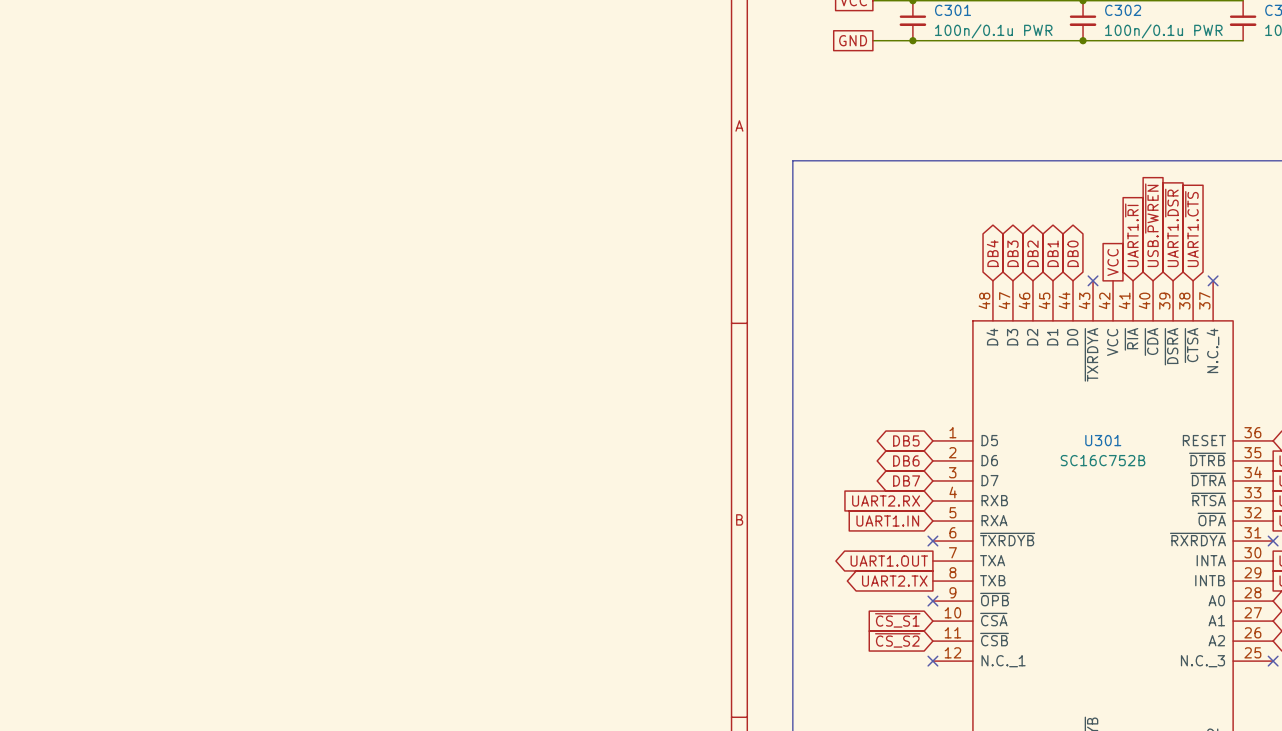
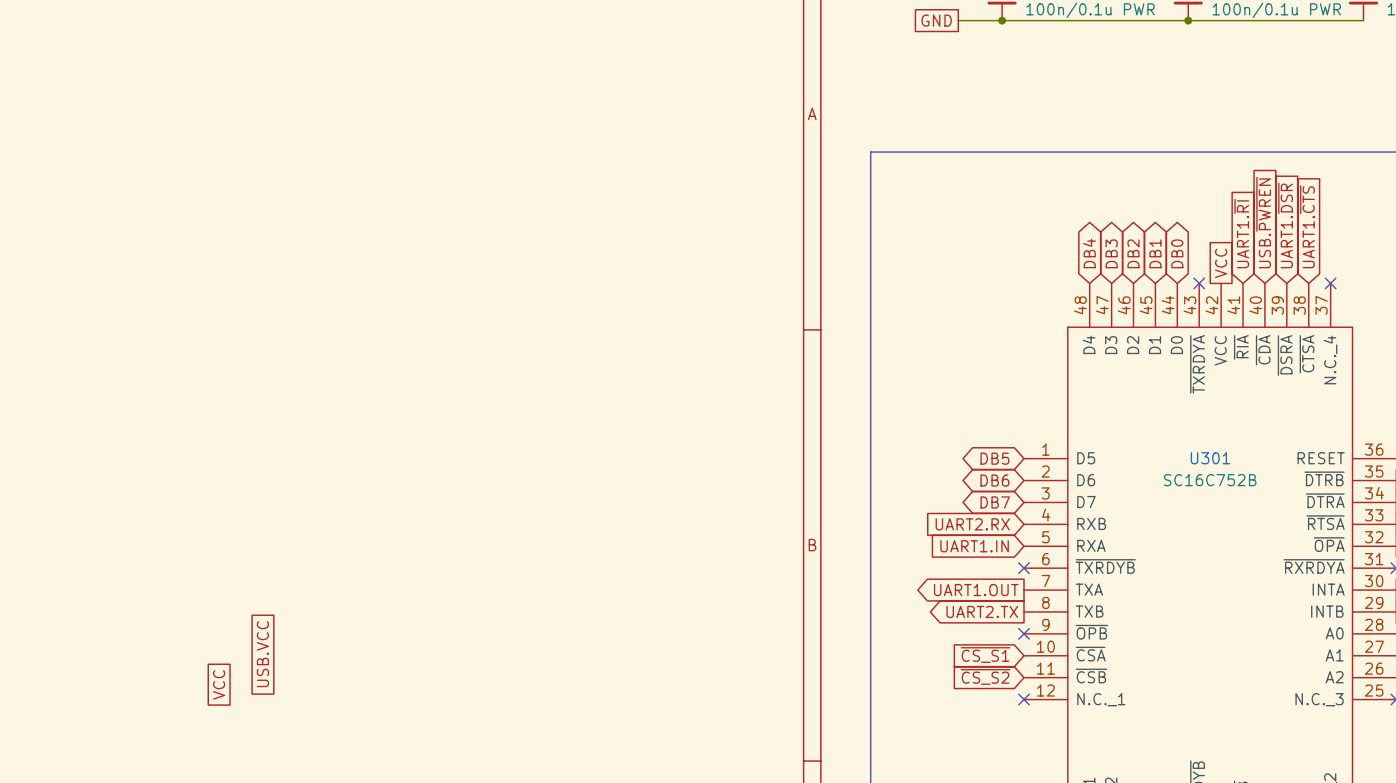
global label: none -> USB.VCC (262, 654)
global label: none -> VCC (219, 684)

